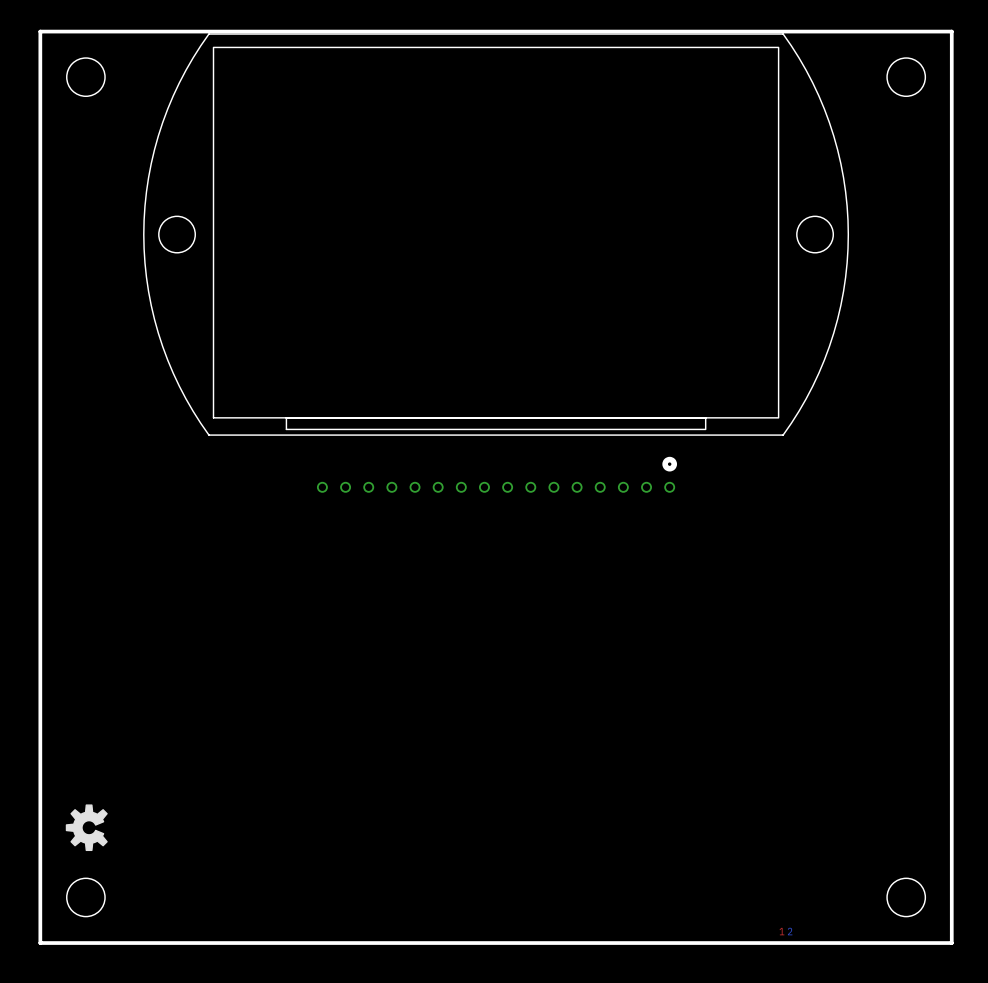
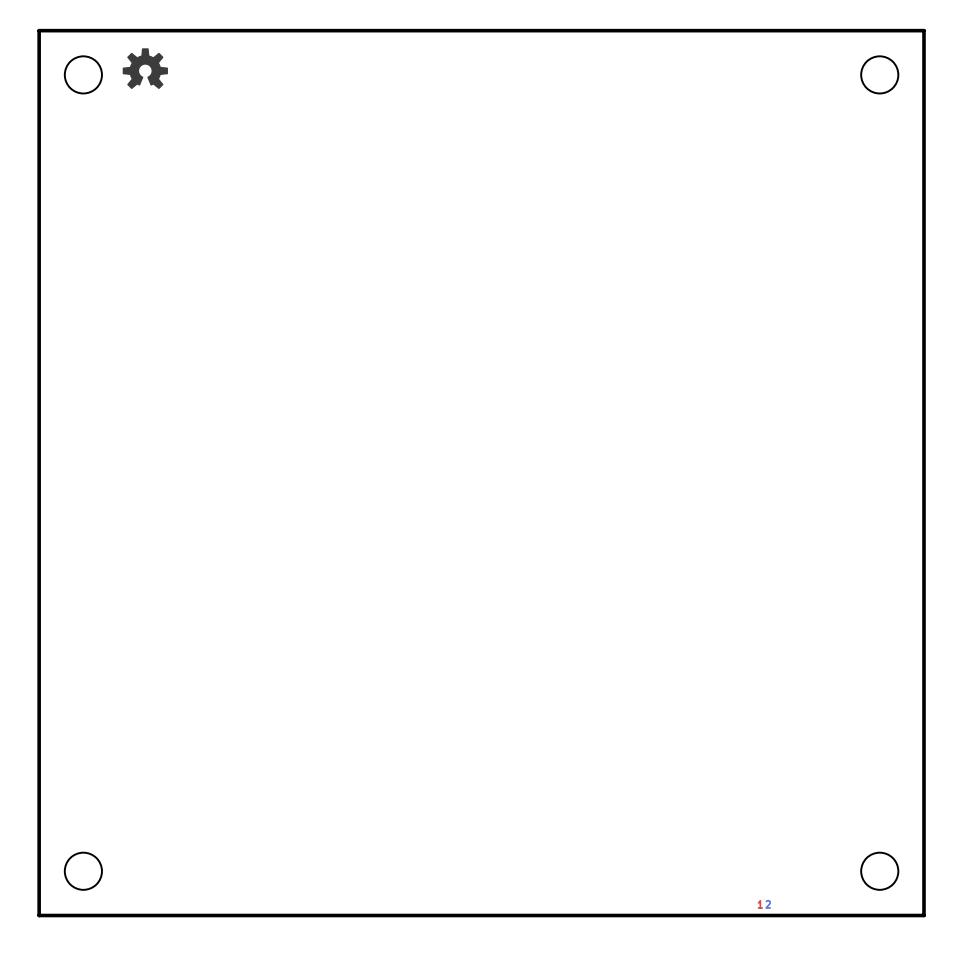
drawing: none -> [122, 48, 168, 90]
part: (496, 263) -> none
drawing: [65, 804, 108, 852] -> none

